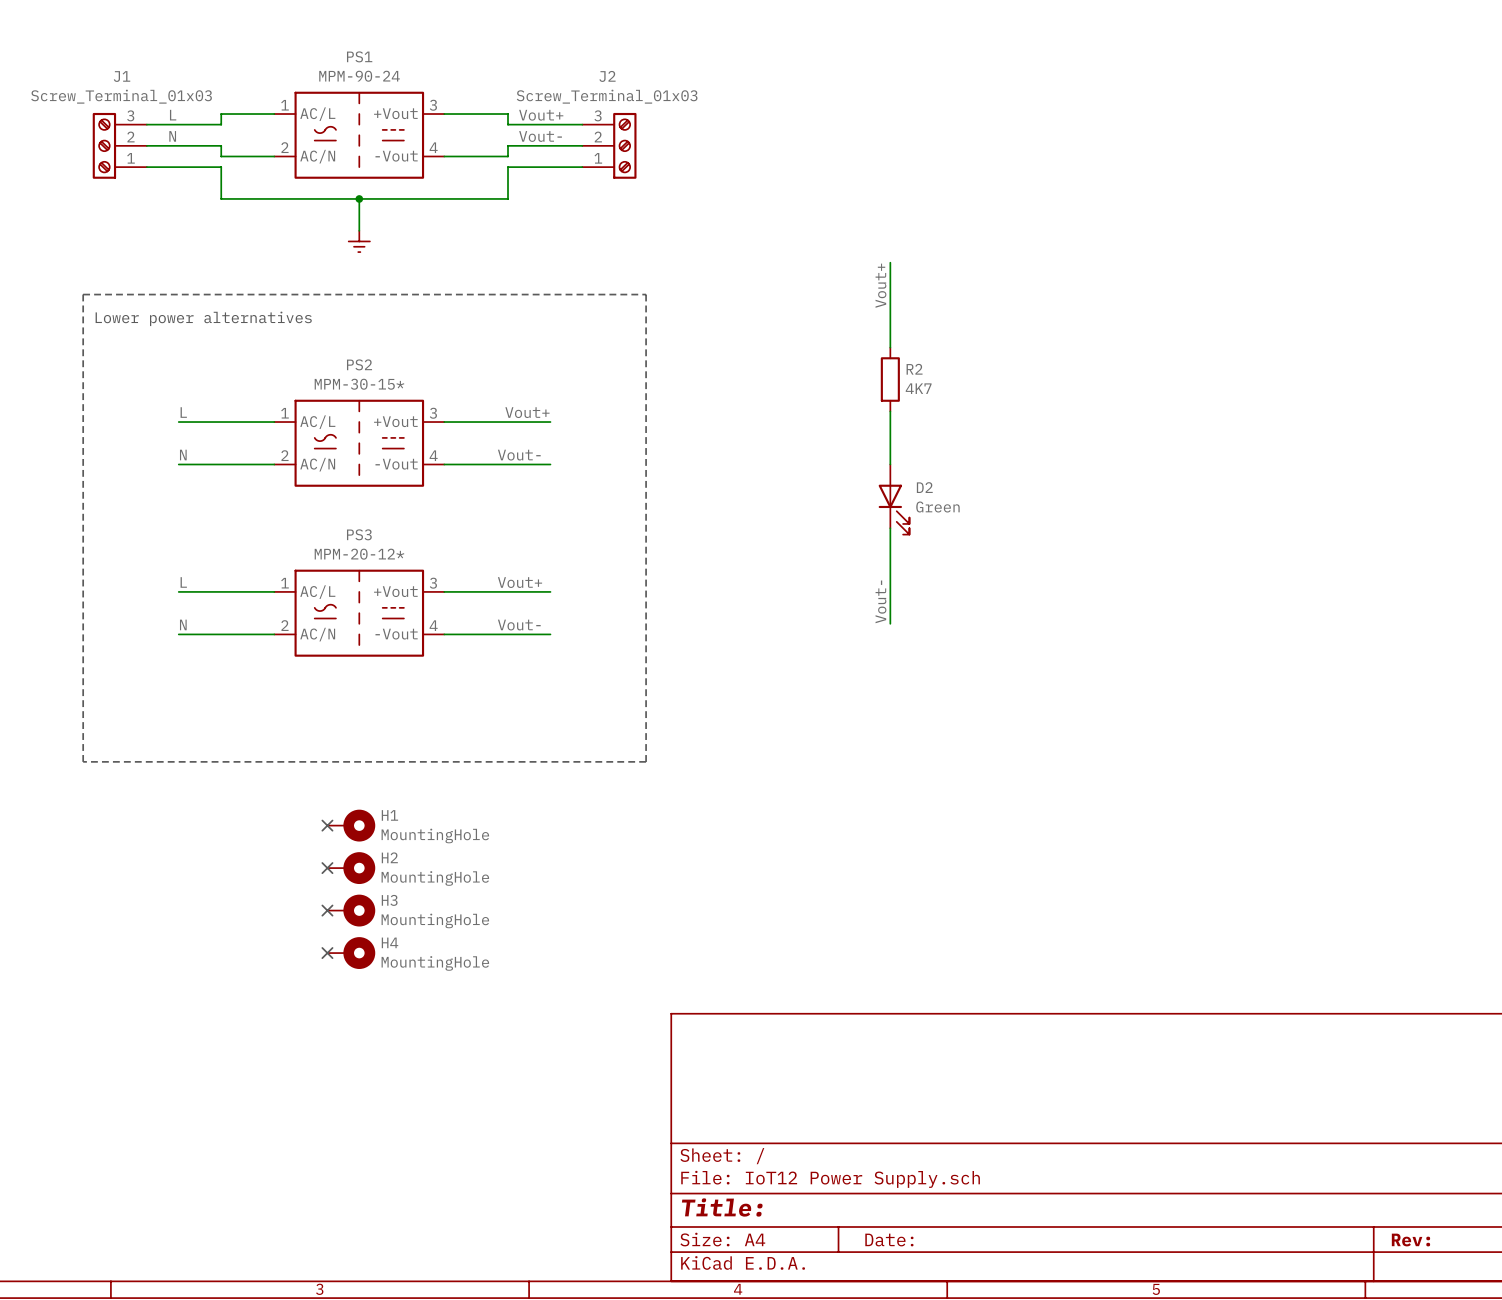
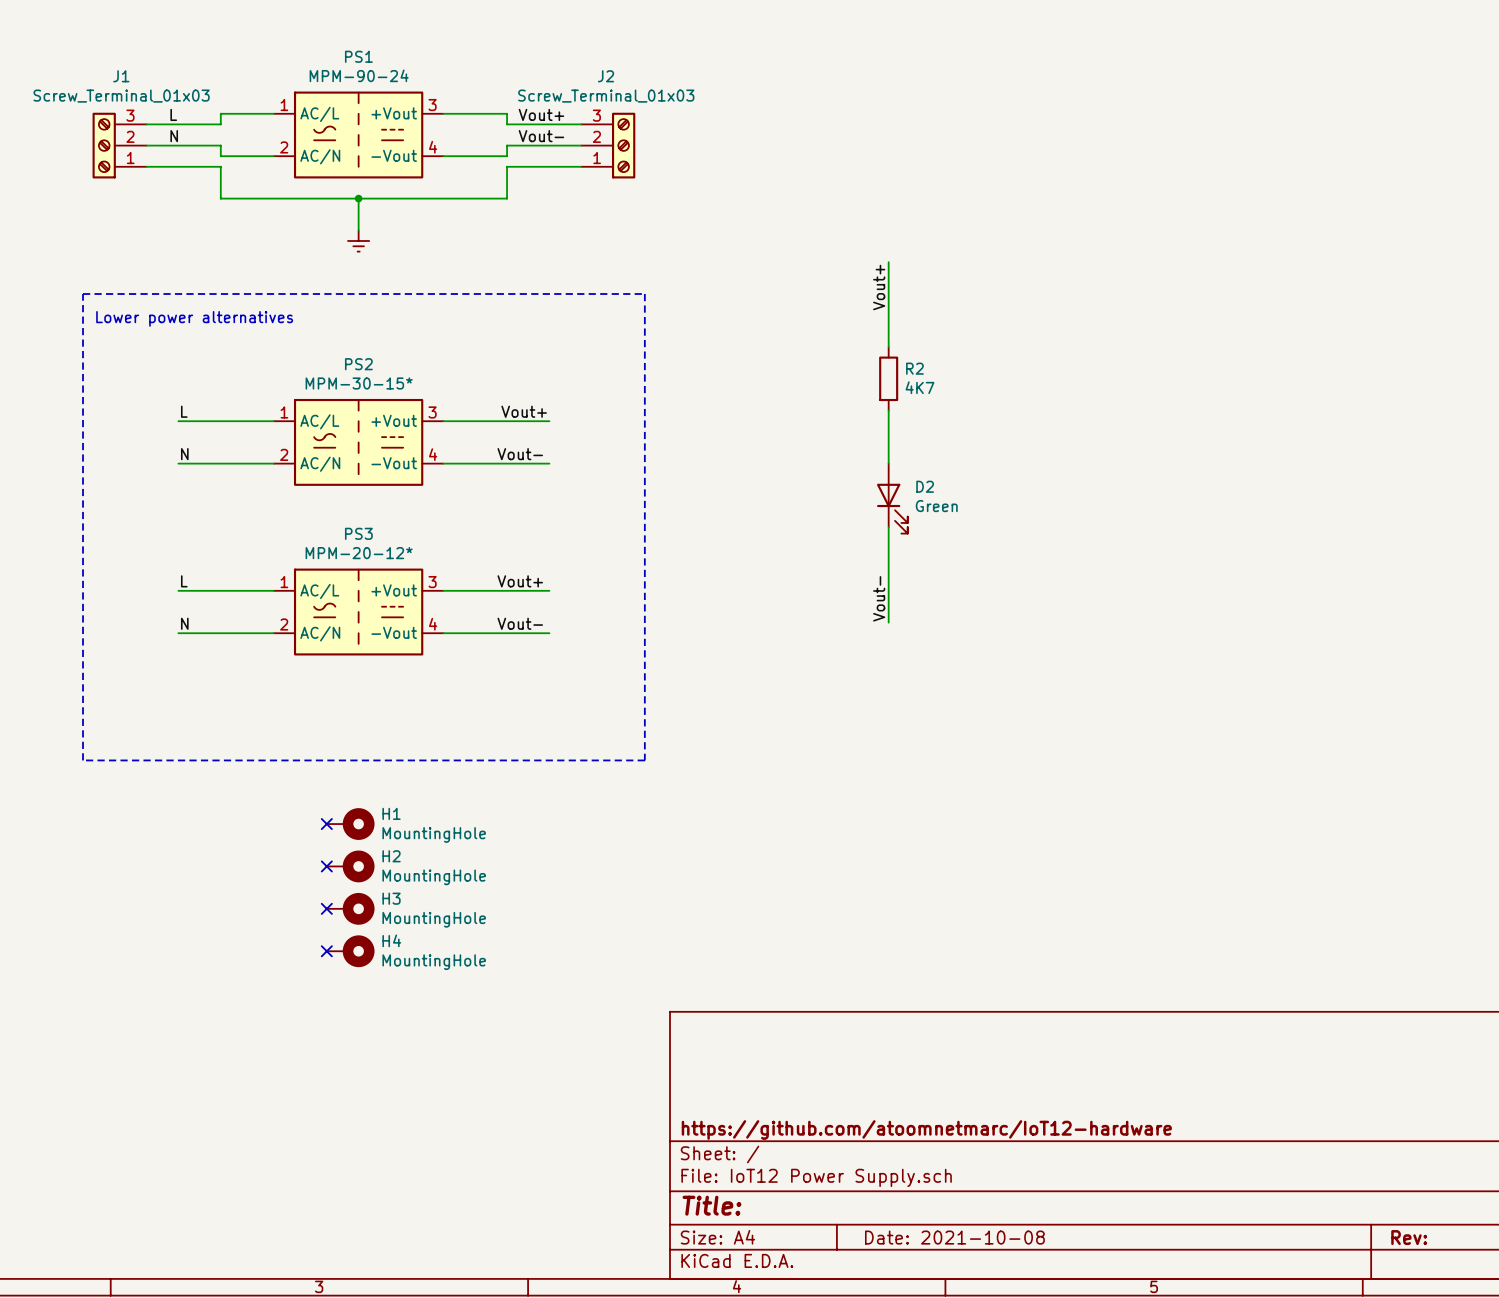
title block: none -> https://github.com/atoomnetmarc/IoT12-hardware (926, 1130)
title block: Date: (889, 1240) -> Date: 2021-10-08 (954, 1237)

